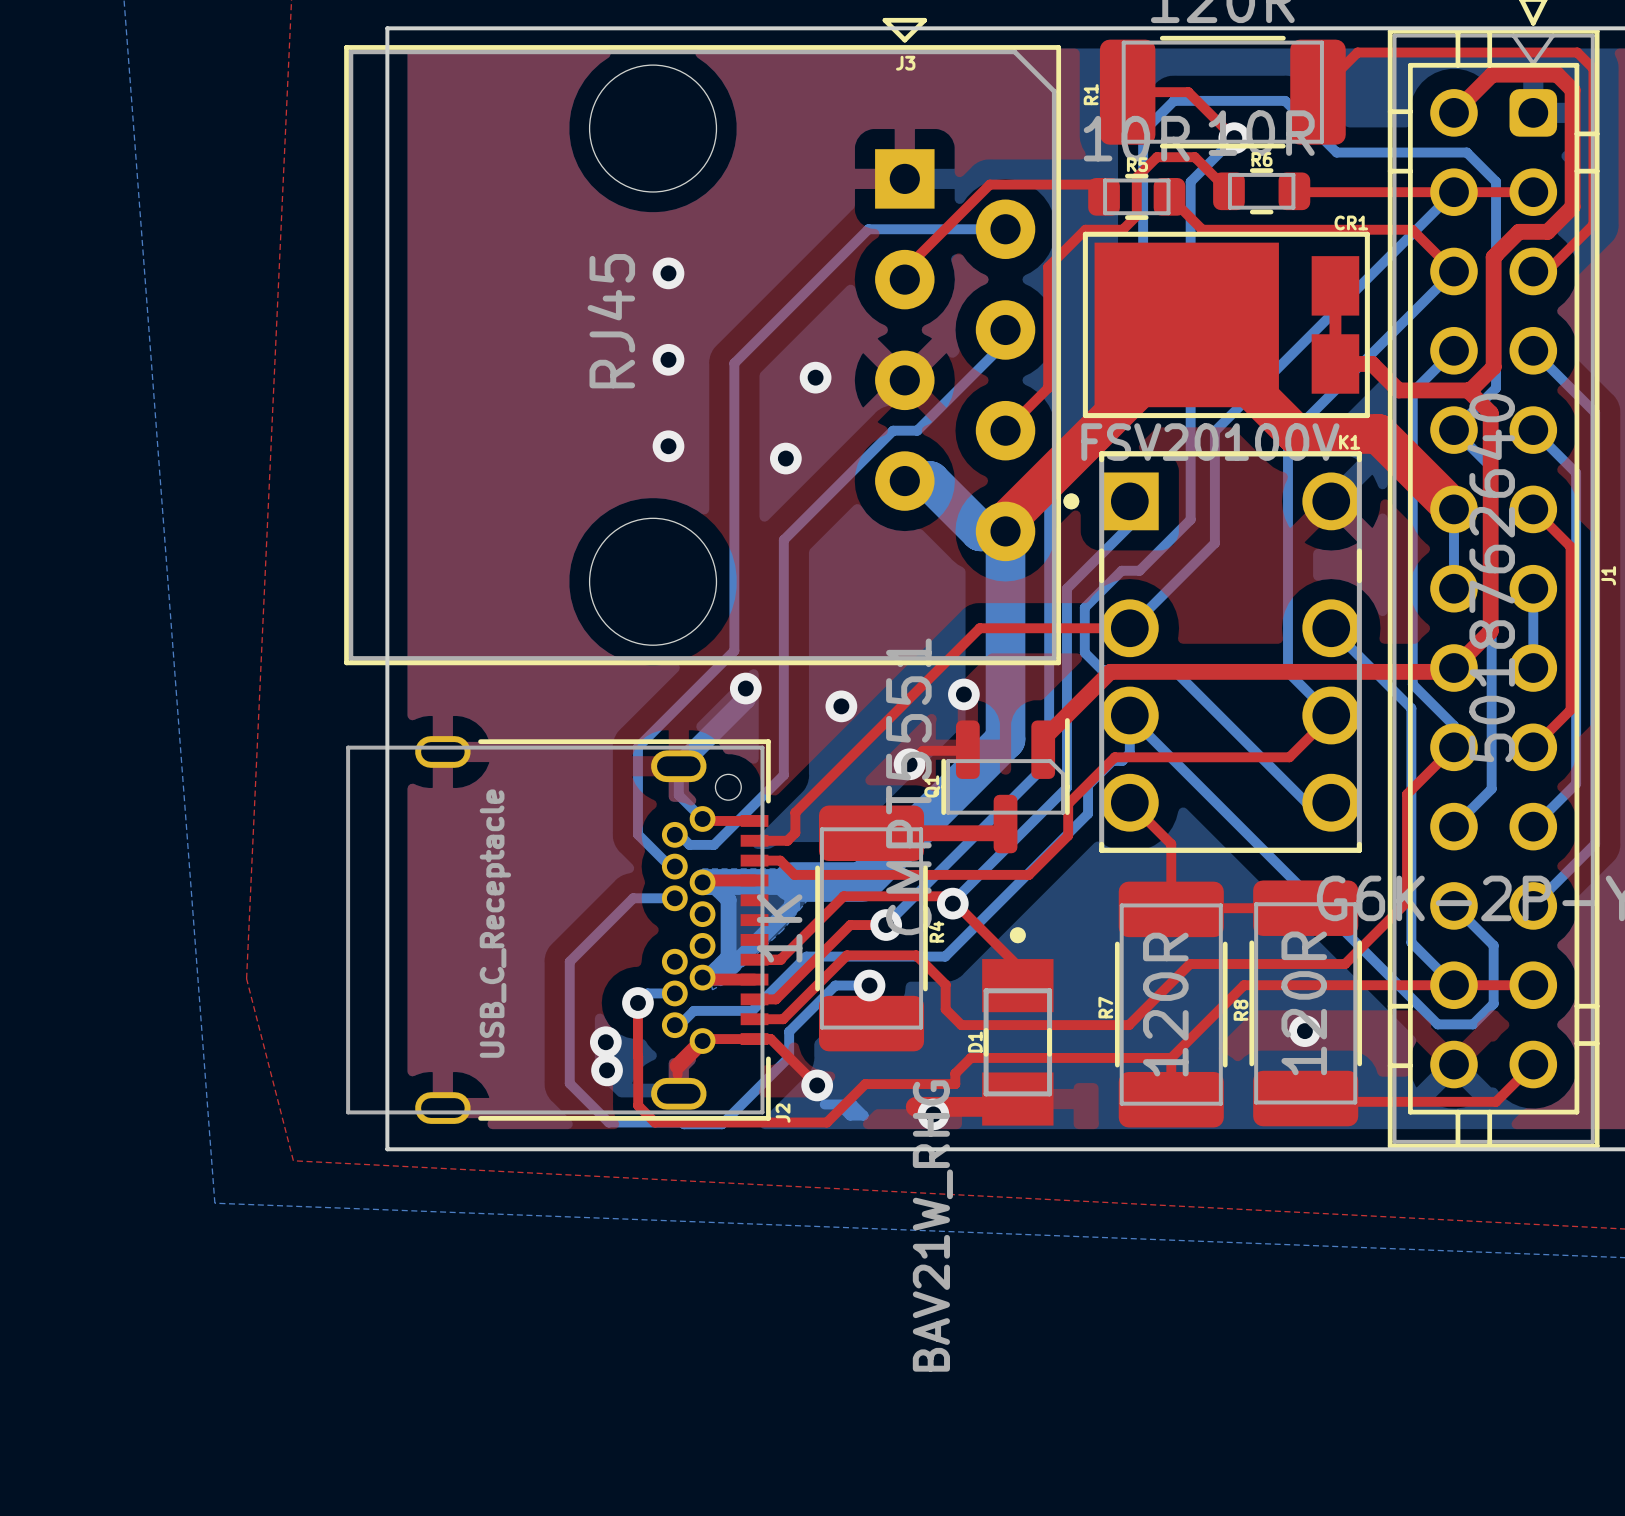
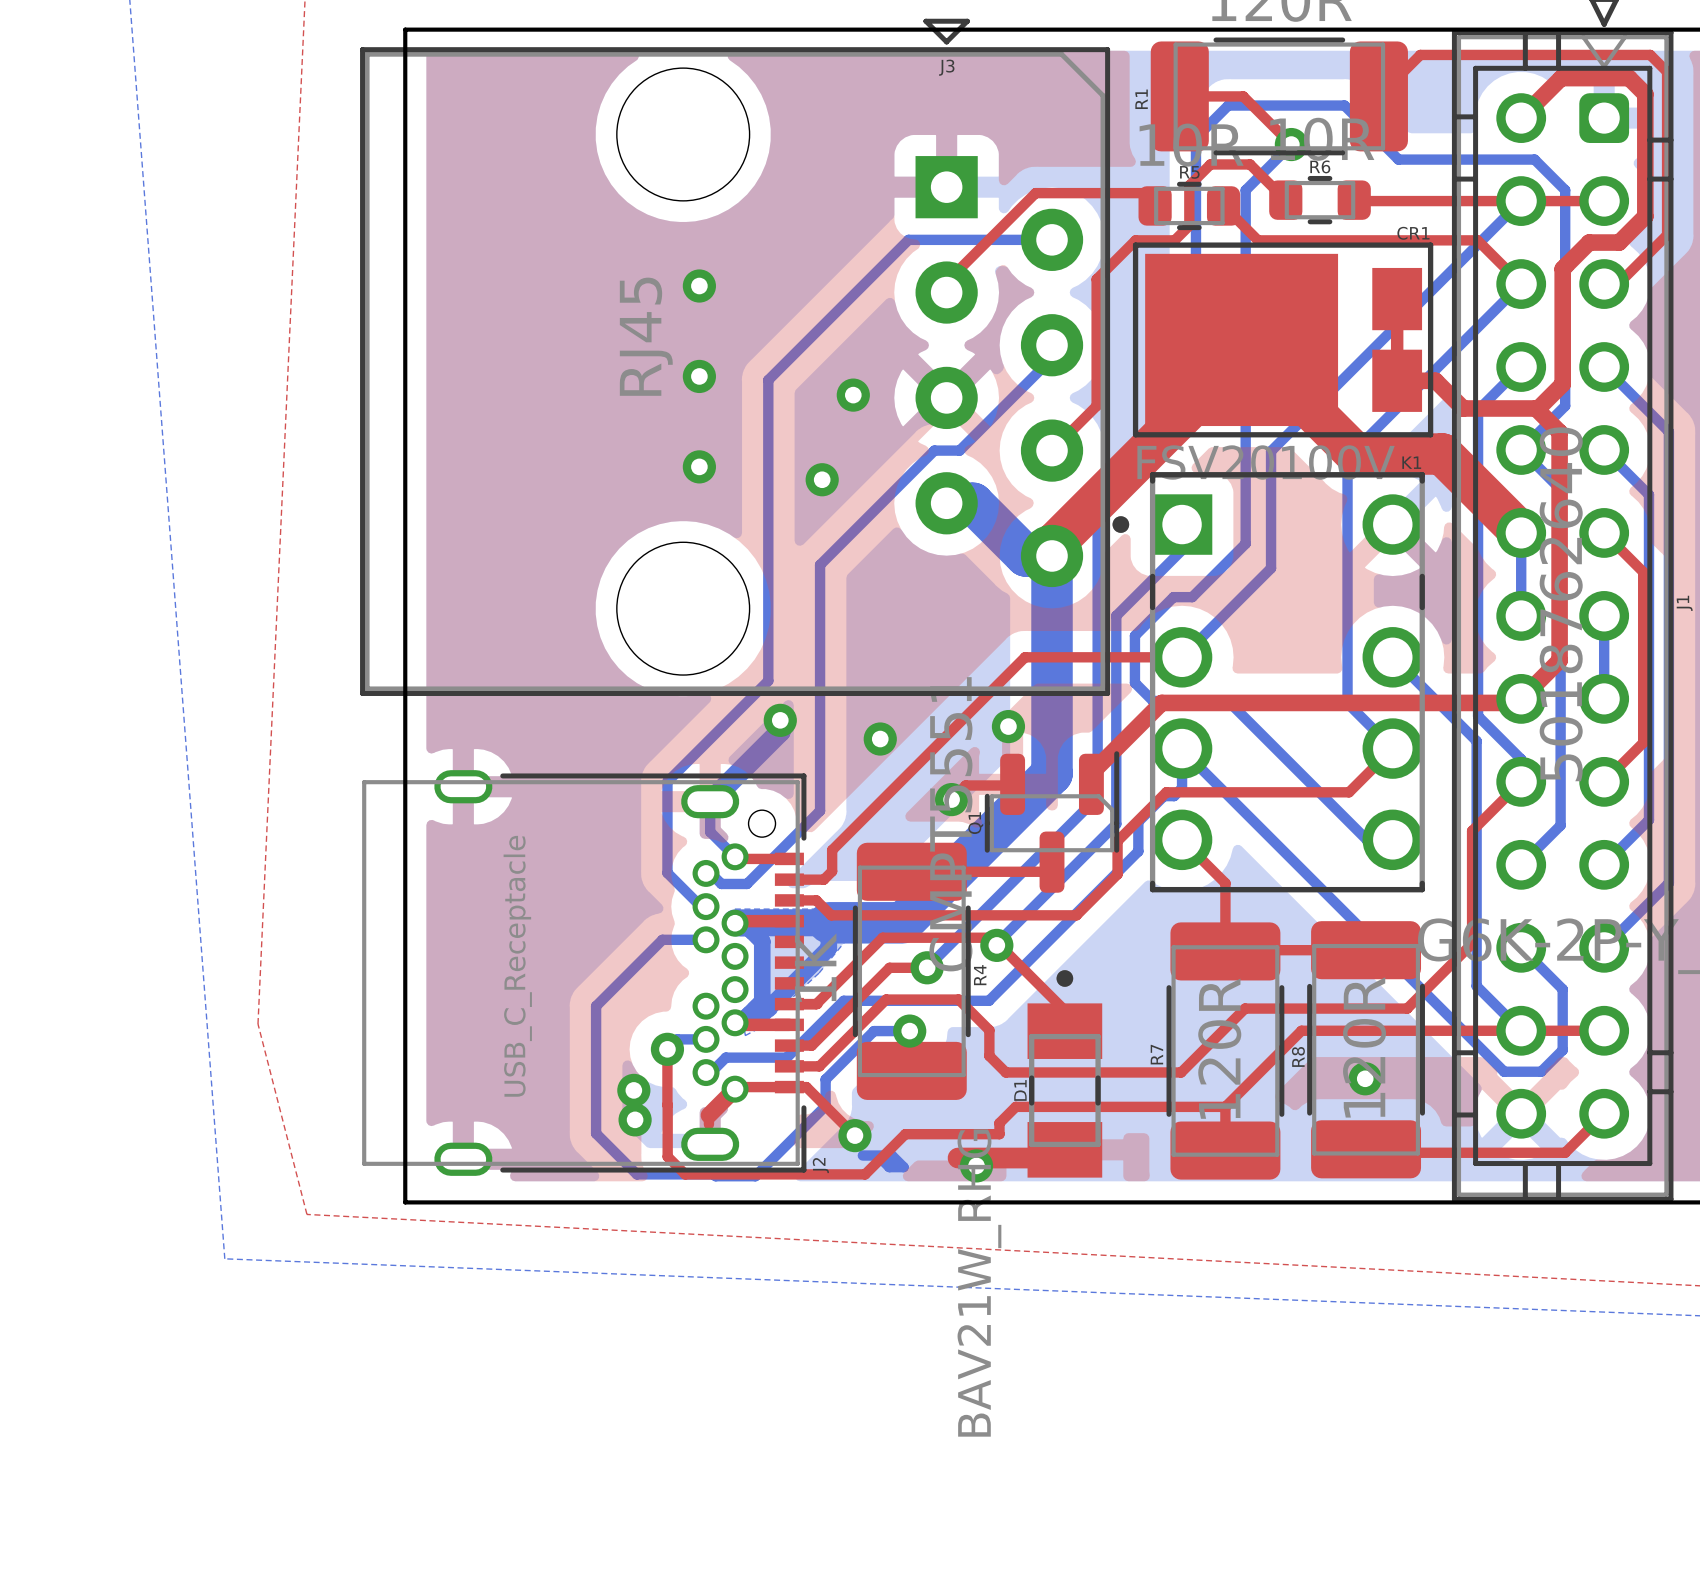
top track width: thick (871, 833) (996, 833) -> thin (911, 871) (1042, 871)

